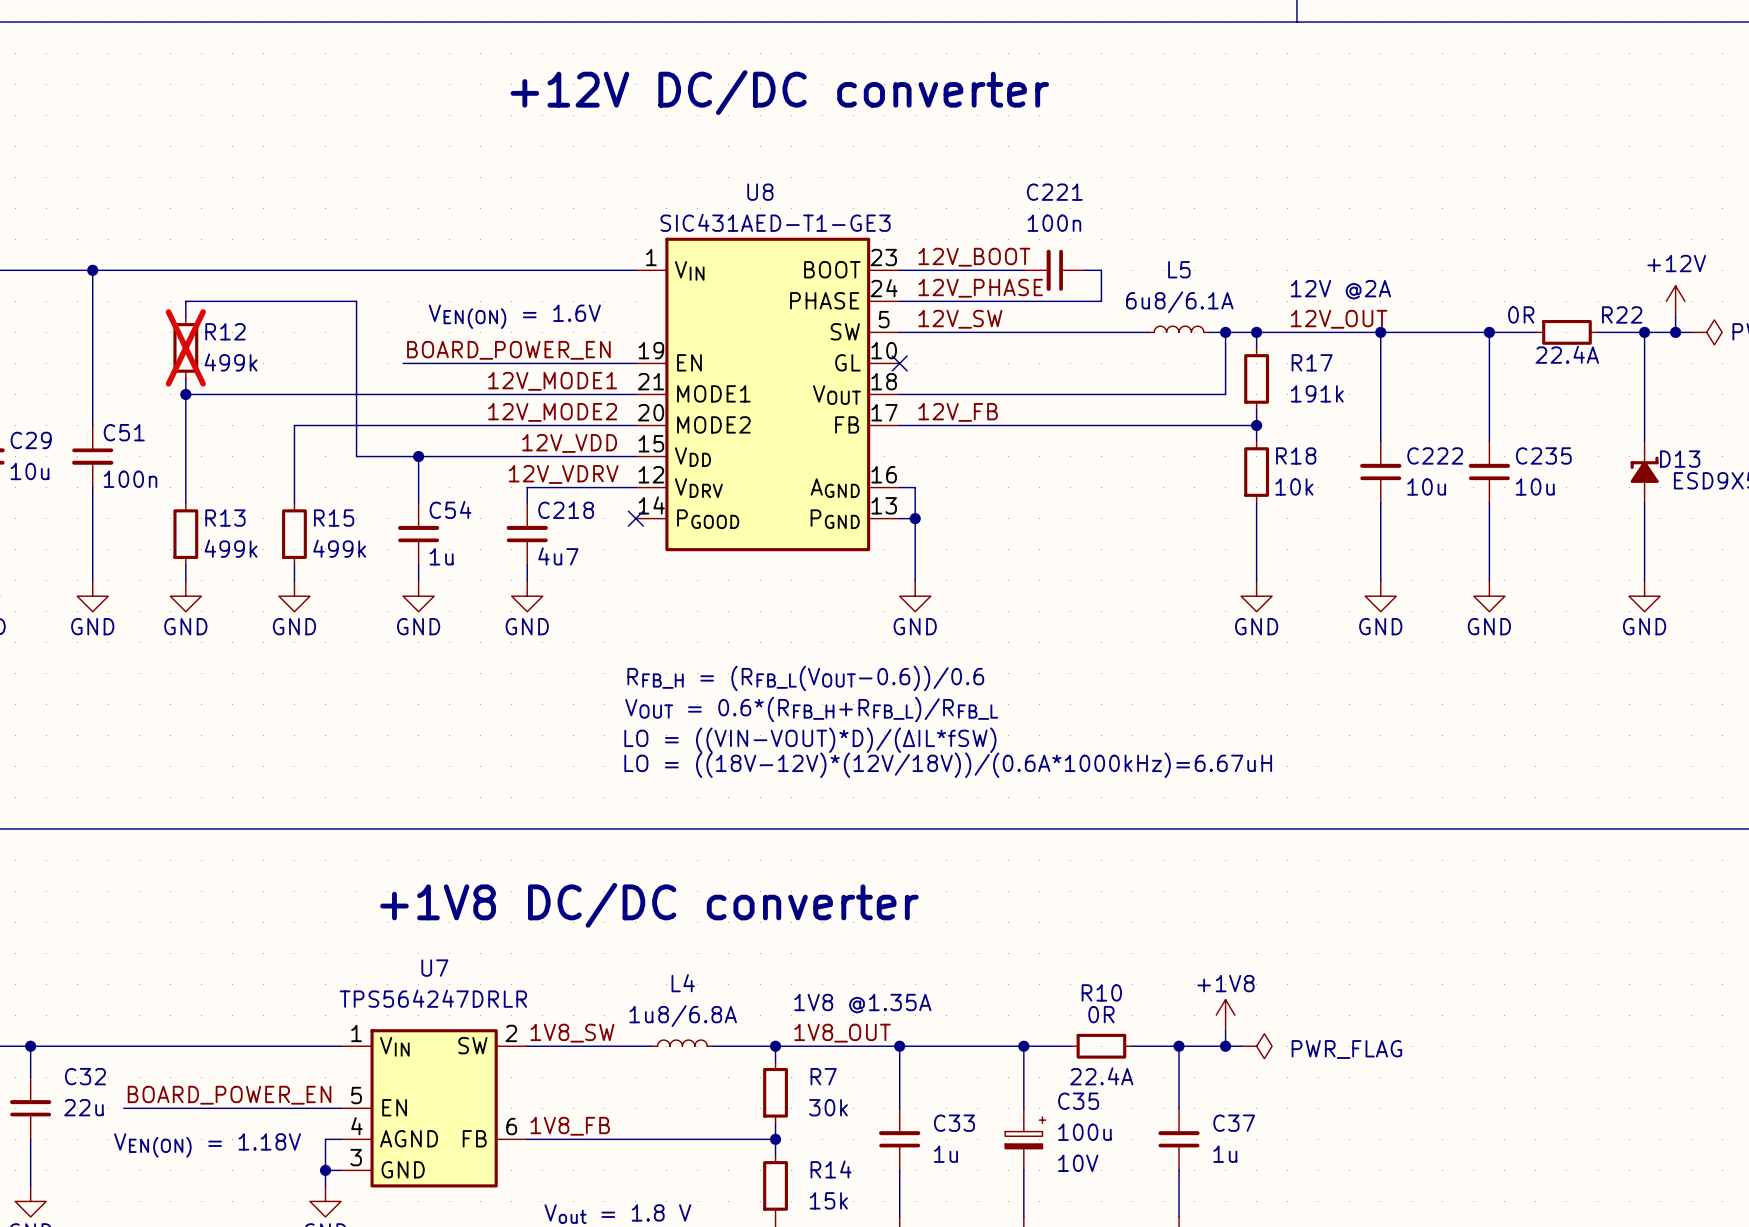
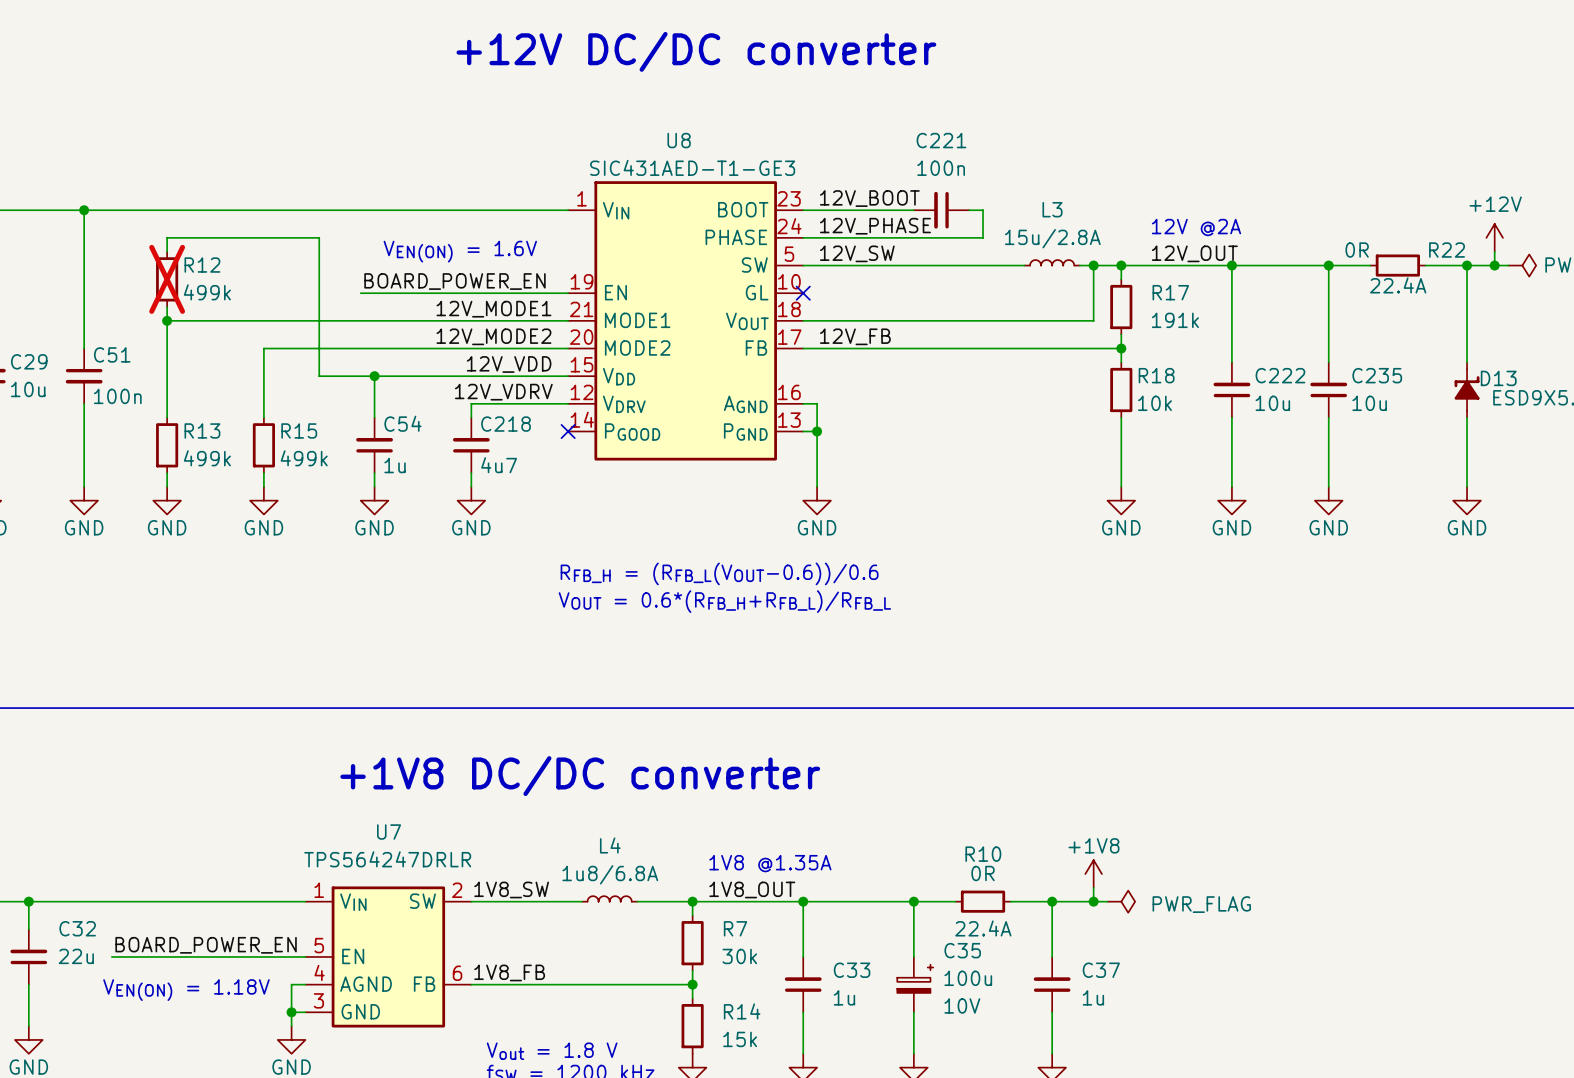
L5 name: L5 (1179, 269) -> L3 (1052, 209)
L5 text: 6u8/6.1A (1179, 302) -> 15u/2.8A (1052, 238)
text: LO = ((VIN-VOUT)*D)/(ΔIL*fSW) (810, 740) -> none
text: LO = ((18V-12V)*(12V/18V))/(0.6A*1000kHz)=6.67uH (948, 765) -> none

